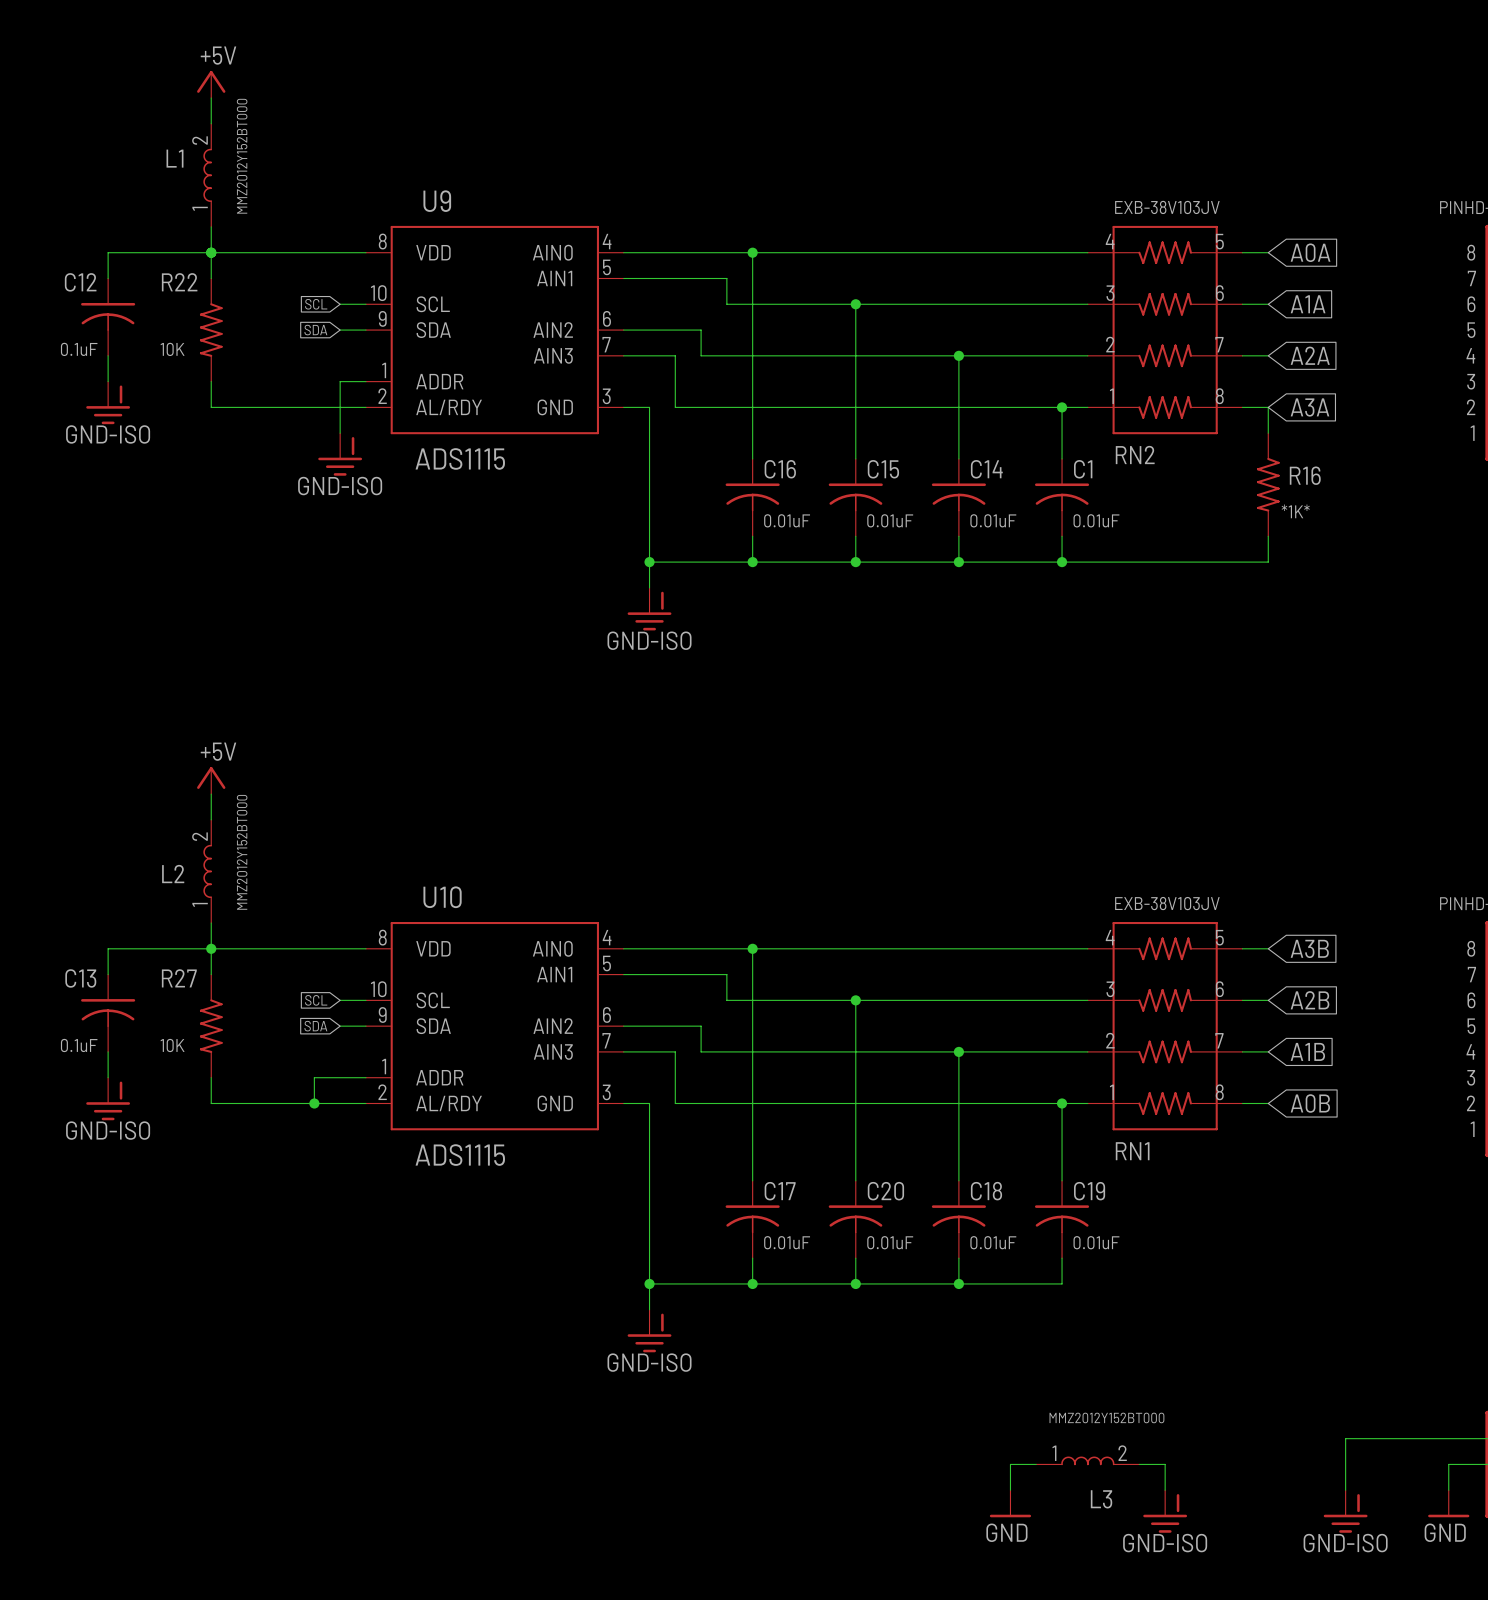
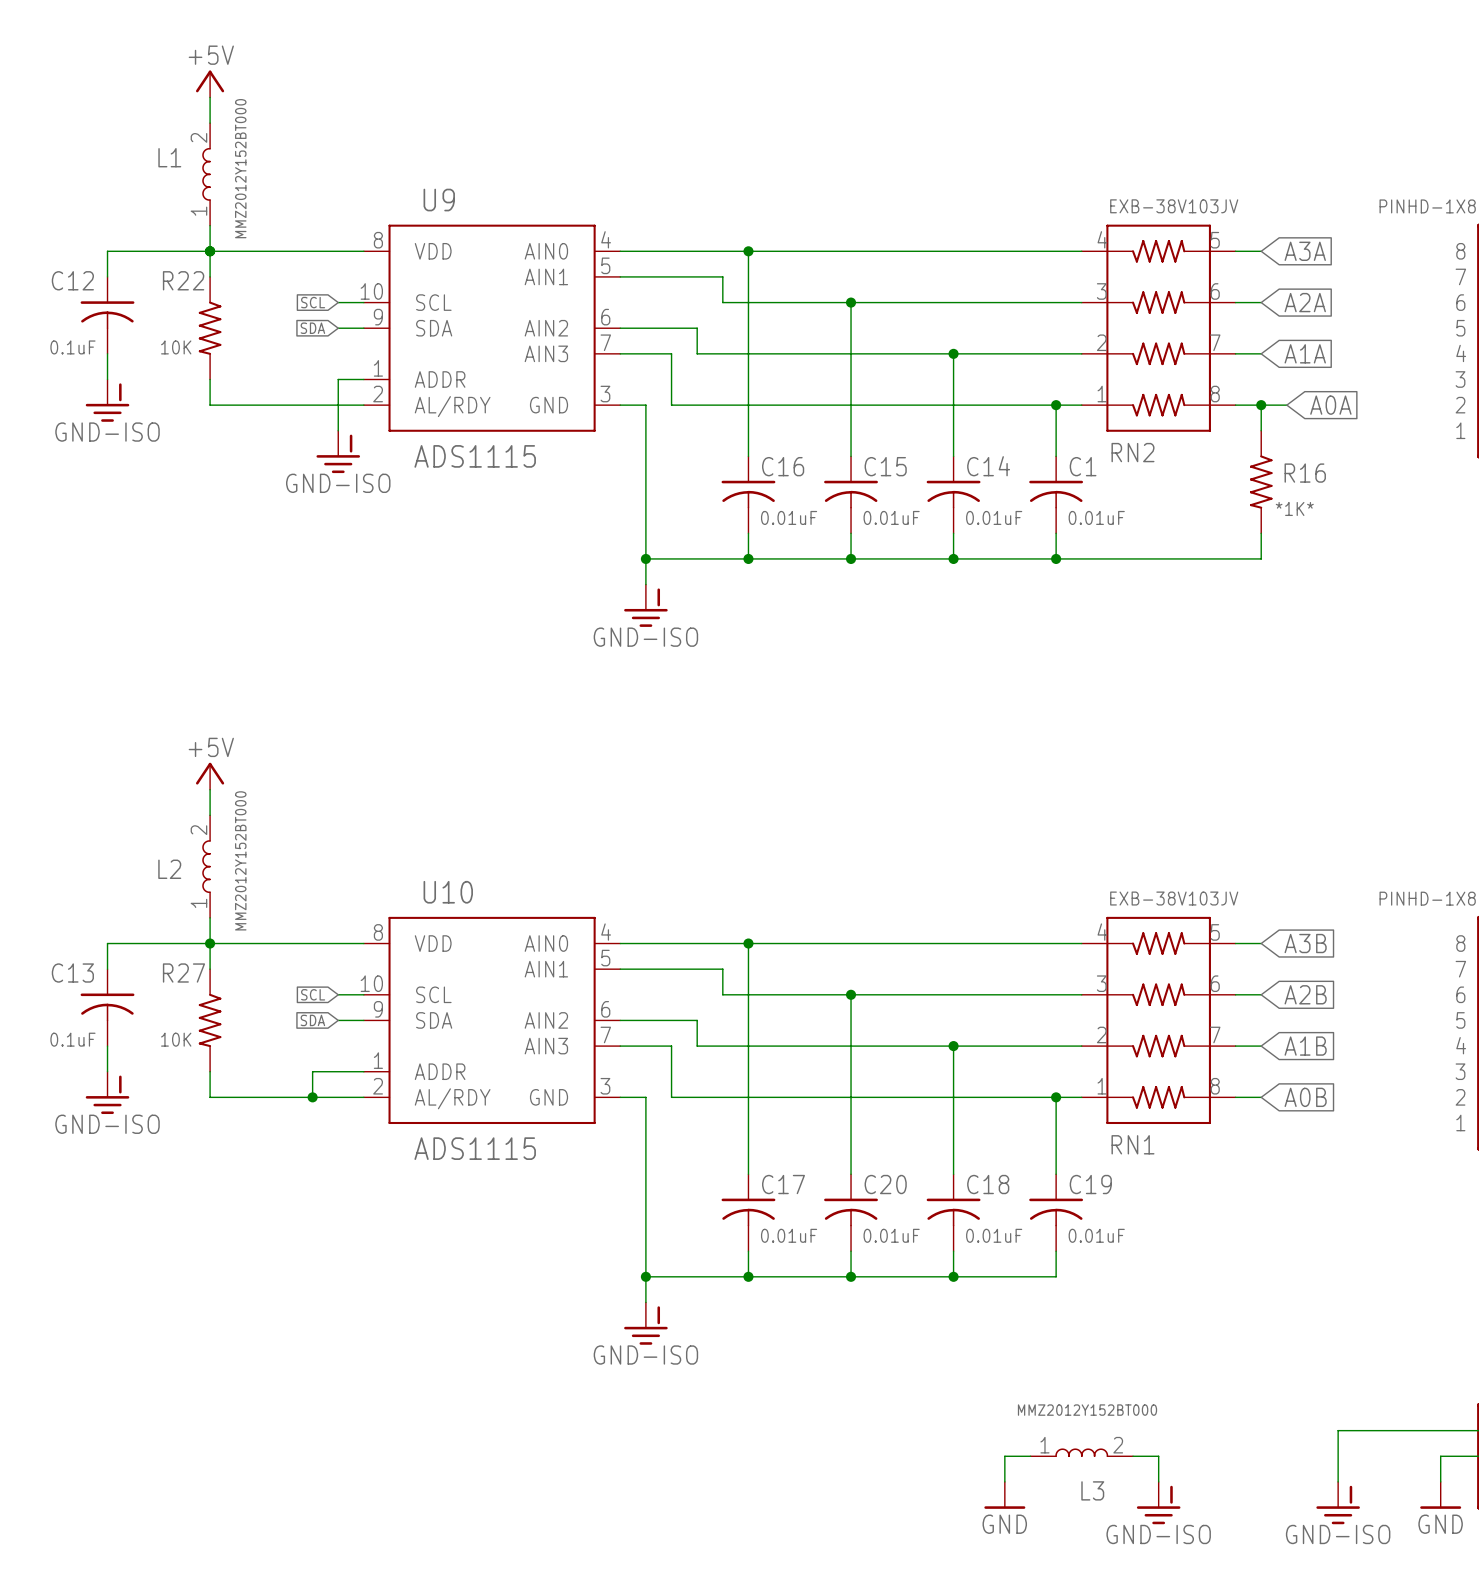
global label: A0A (1310, 252) -> A3A (1305, 251)
global label: A1A (1308, 304) -> A2A (1305, 302)
global label: A2A (1310, 355) -> A1A (1305, 353)
wire: none -> (1261, 405) (1286, 405)
junction: none -> (1261, 405)
global label: A3A (1309, 407) -> A0A (1330, 405)

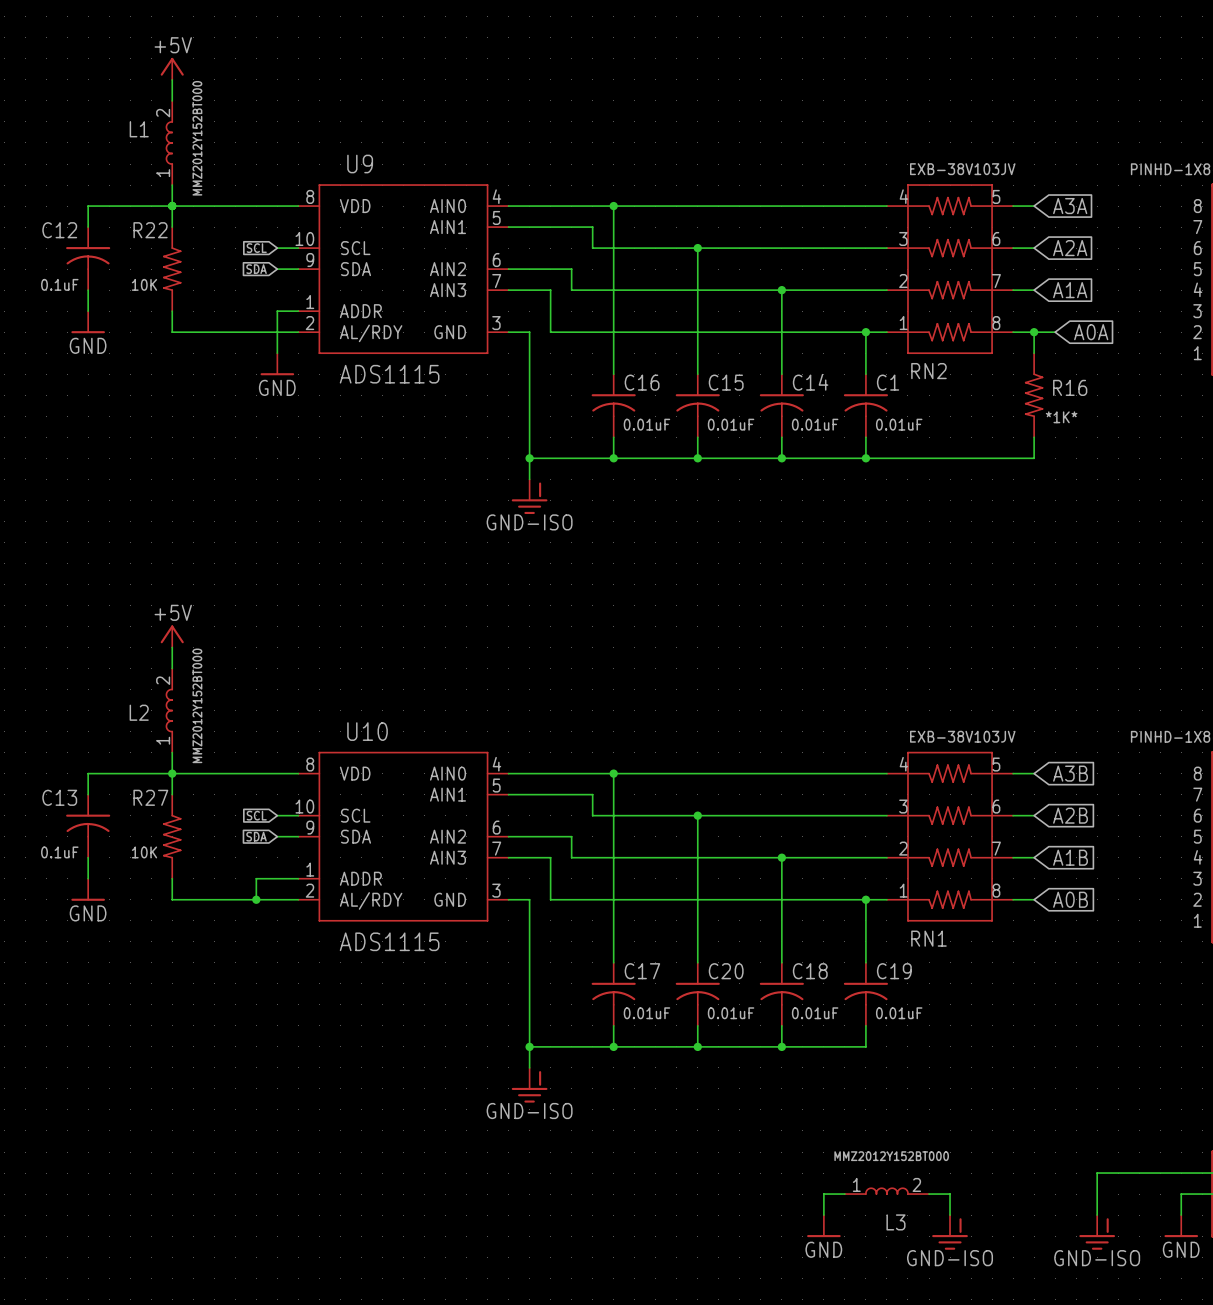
power symbol: GND-ISO (107, 400) -> GND (88, 322)
power symbol: GND-ISO (338, 451) -> GND (277, 364)
power symbol: GND-ISO (107, 1092) -> GND (88, 889)

